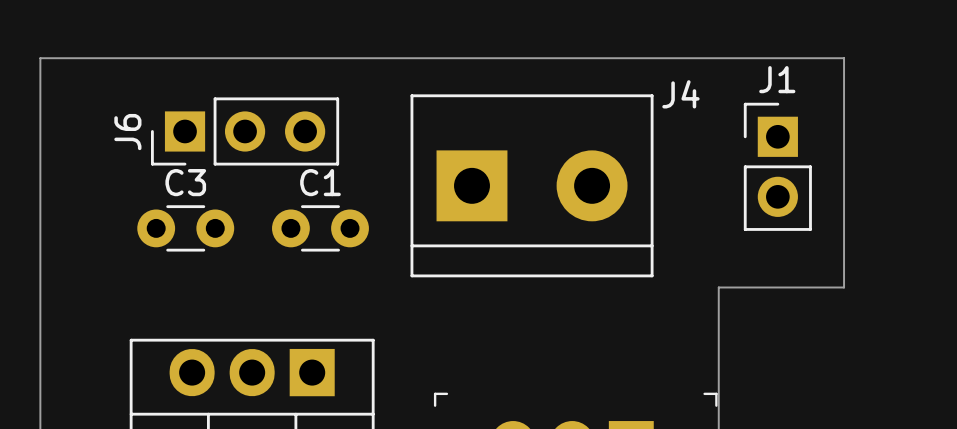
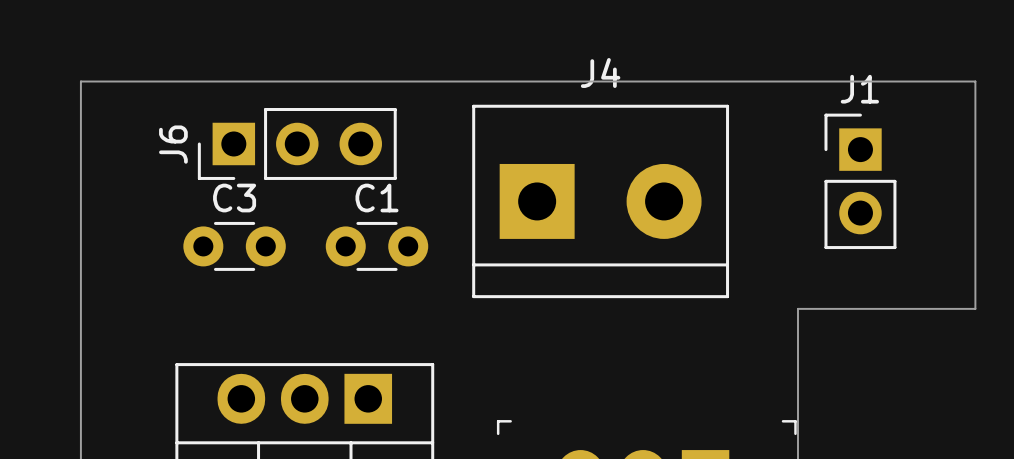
board edge: (40, 72) (40, 58) (844, 58) (844, 287) -> (80, 81) (975, 81) (975, 308) (930, 308)
J4 name position: J4 (680, 94) -> J4 (600, 72)

